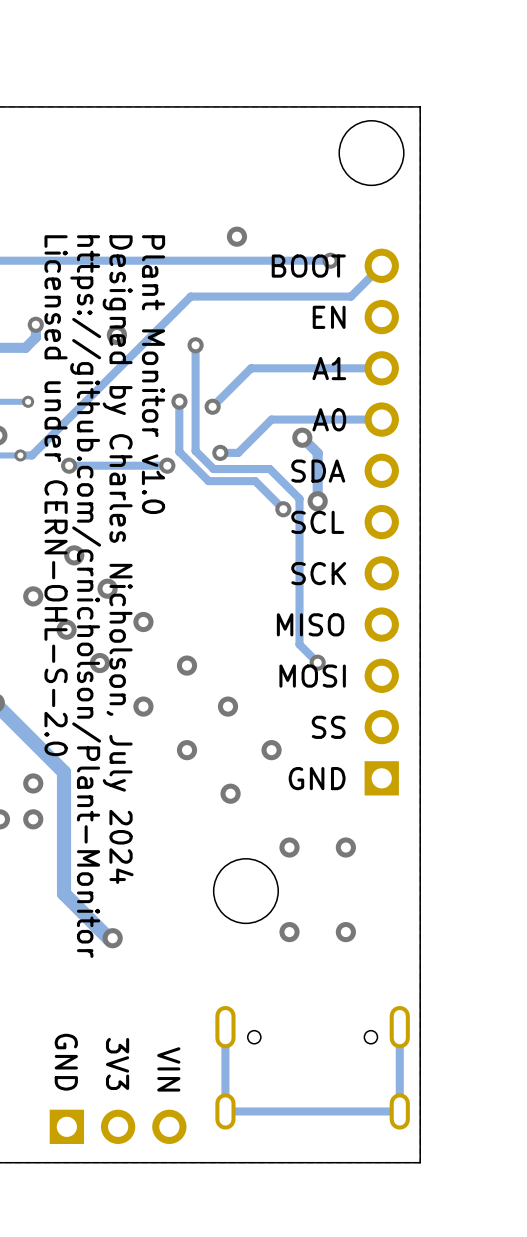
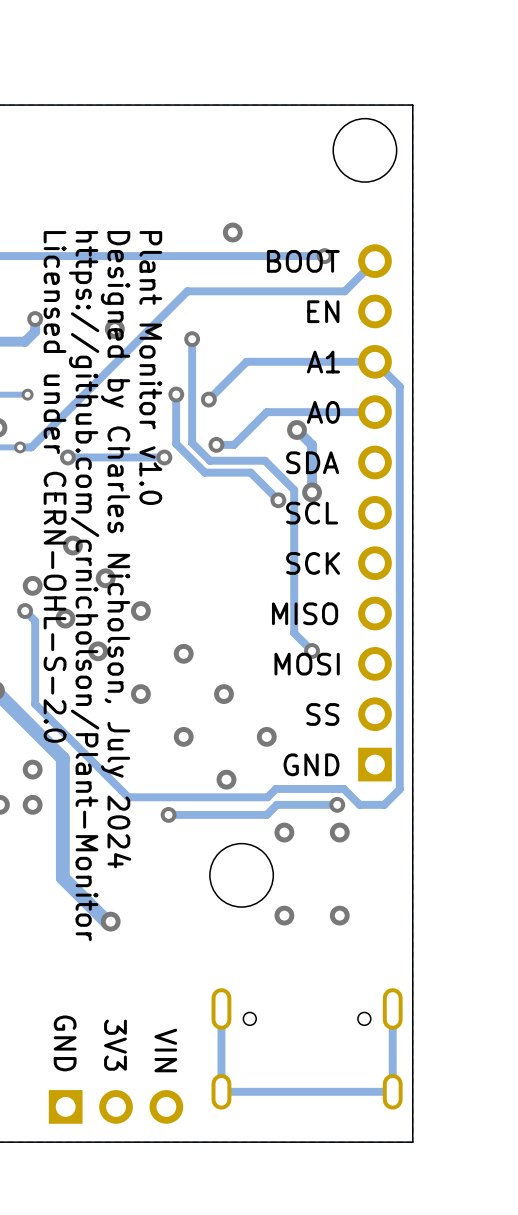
track: none -> (375, 361) (399, 386) (399, 789) (384, 804) (359, 804) (343, 788) (275, 788) (267, 797) (128, 797) (35, 704) (35, 621) (25, 611)
via: none -> (25, 611)
track: none -> (337, 804) (276, 804) (266, 814) (168, 814)
via: none -> (337, 804)
via: none -> (168, 814)

